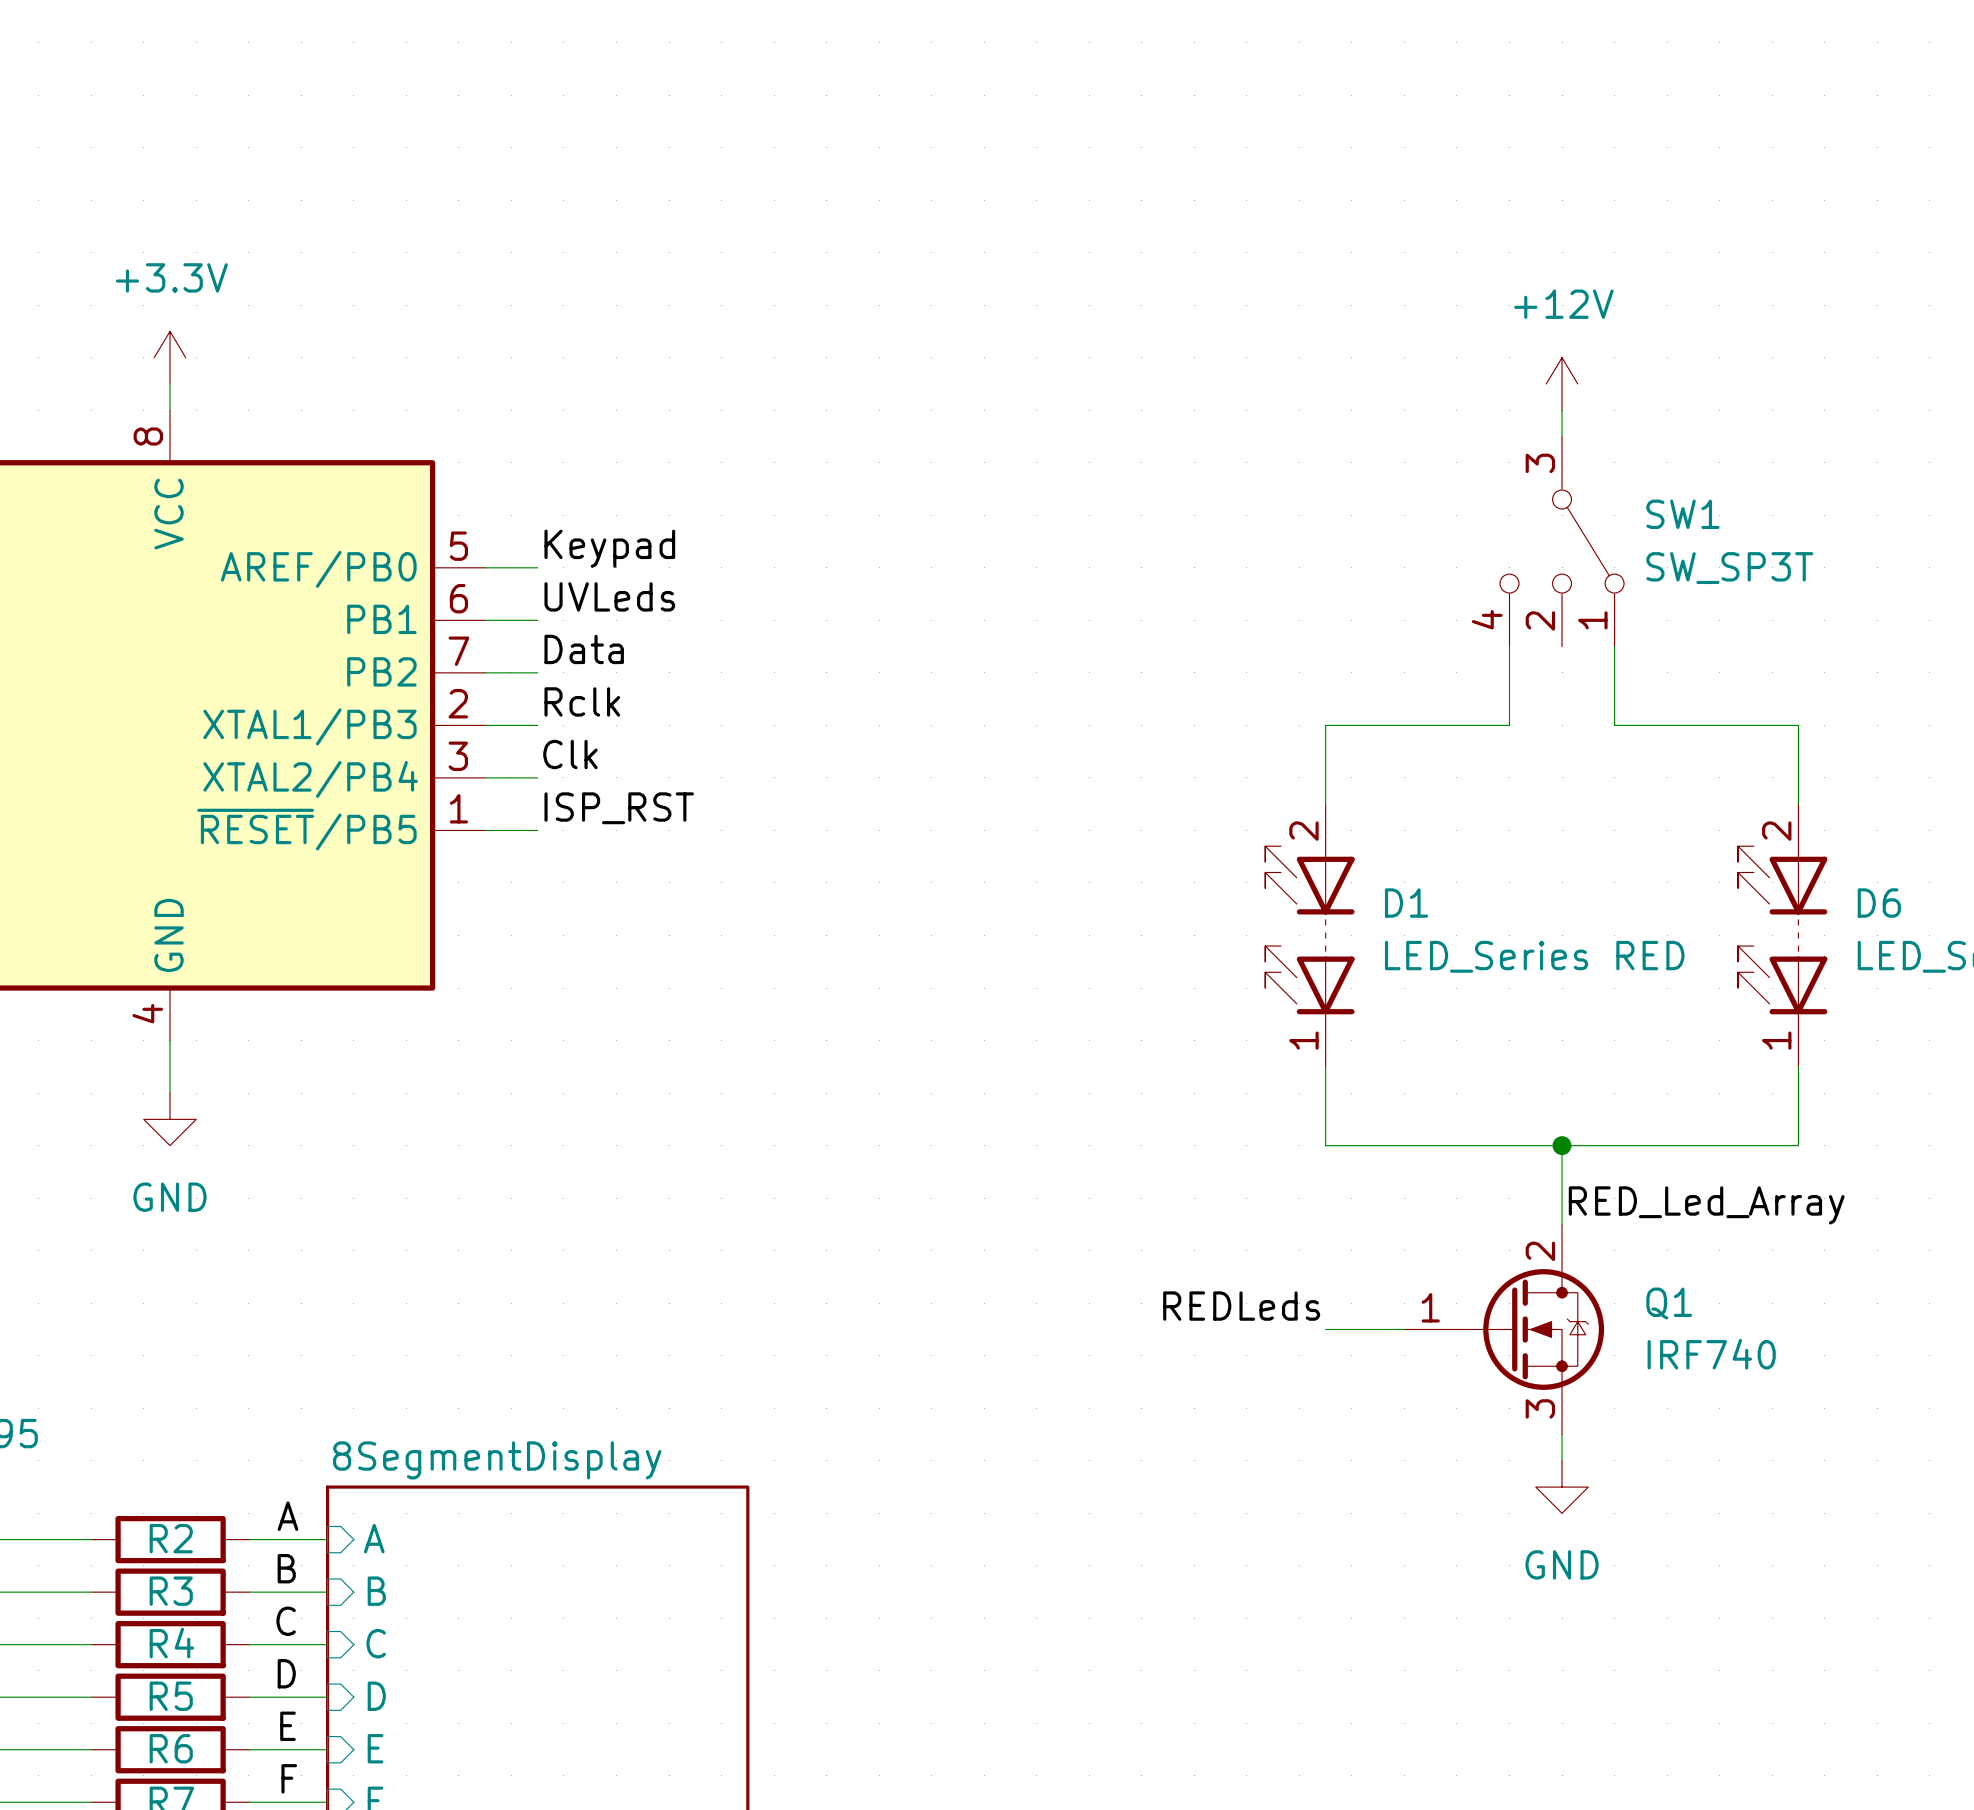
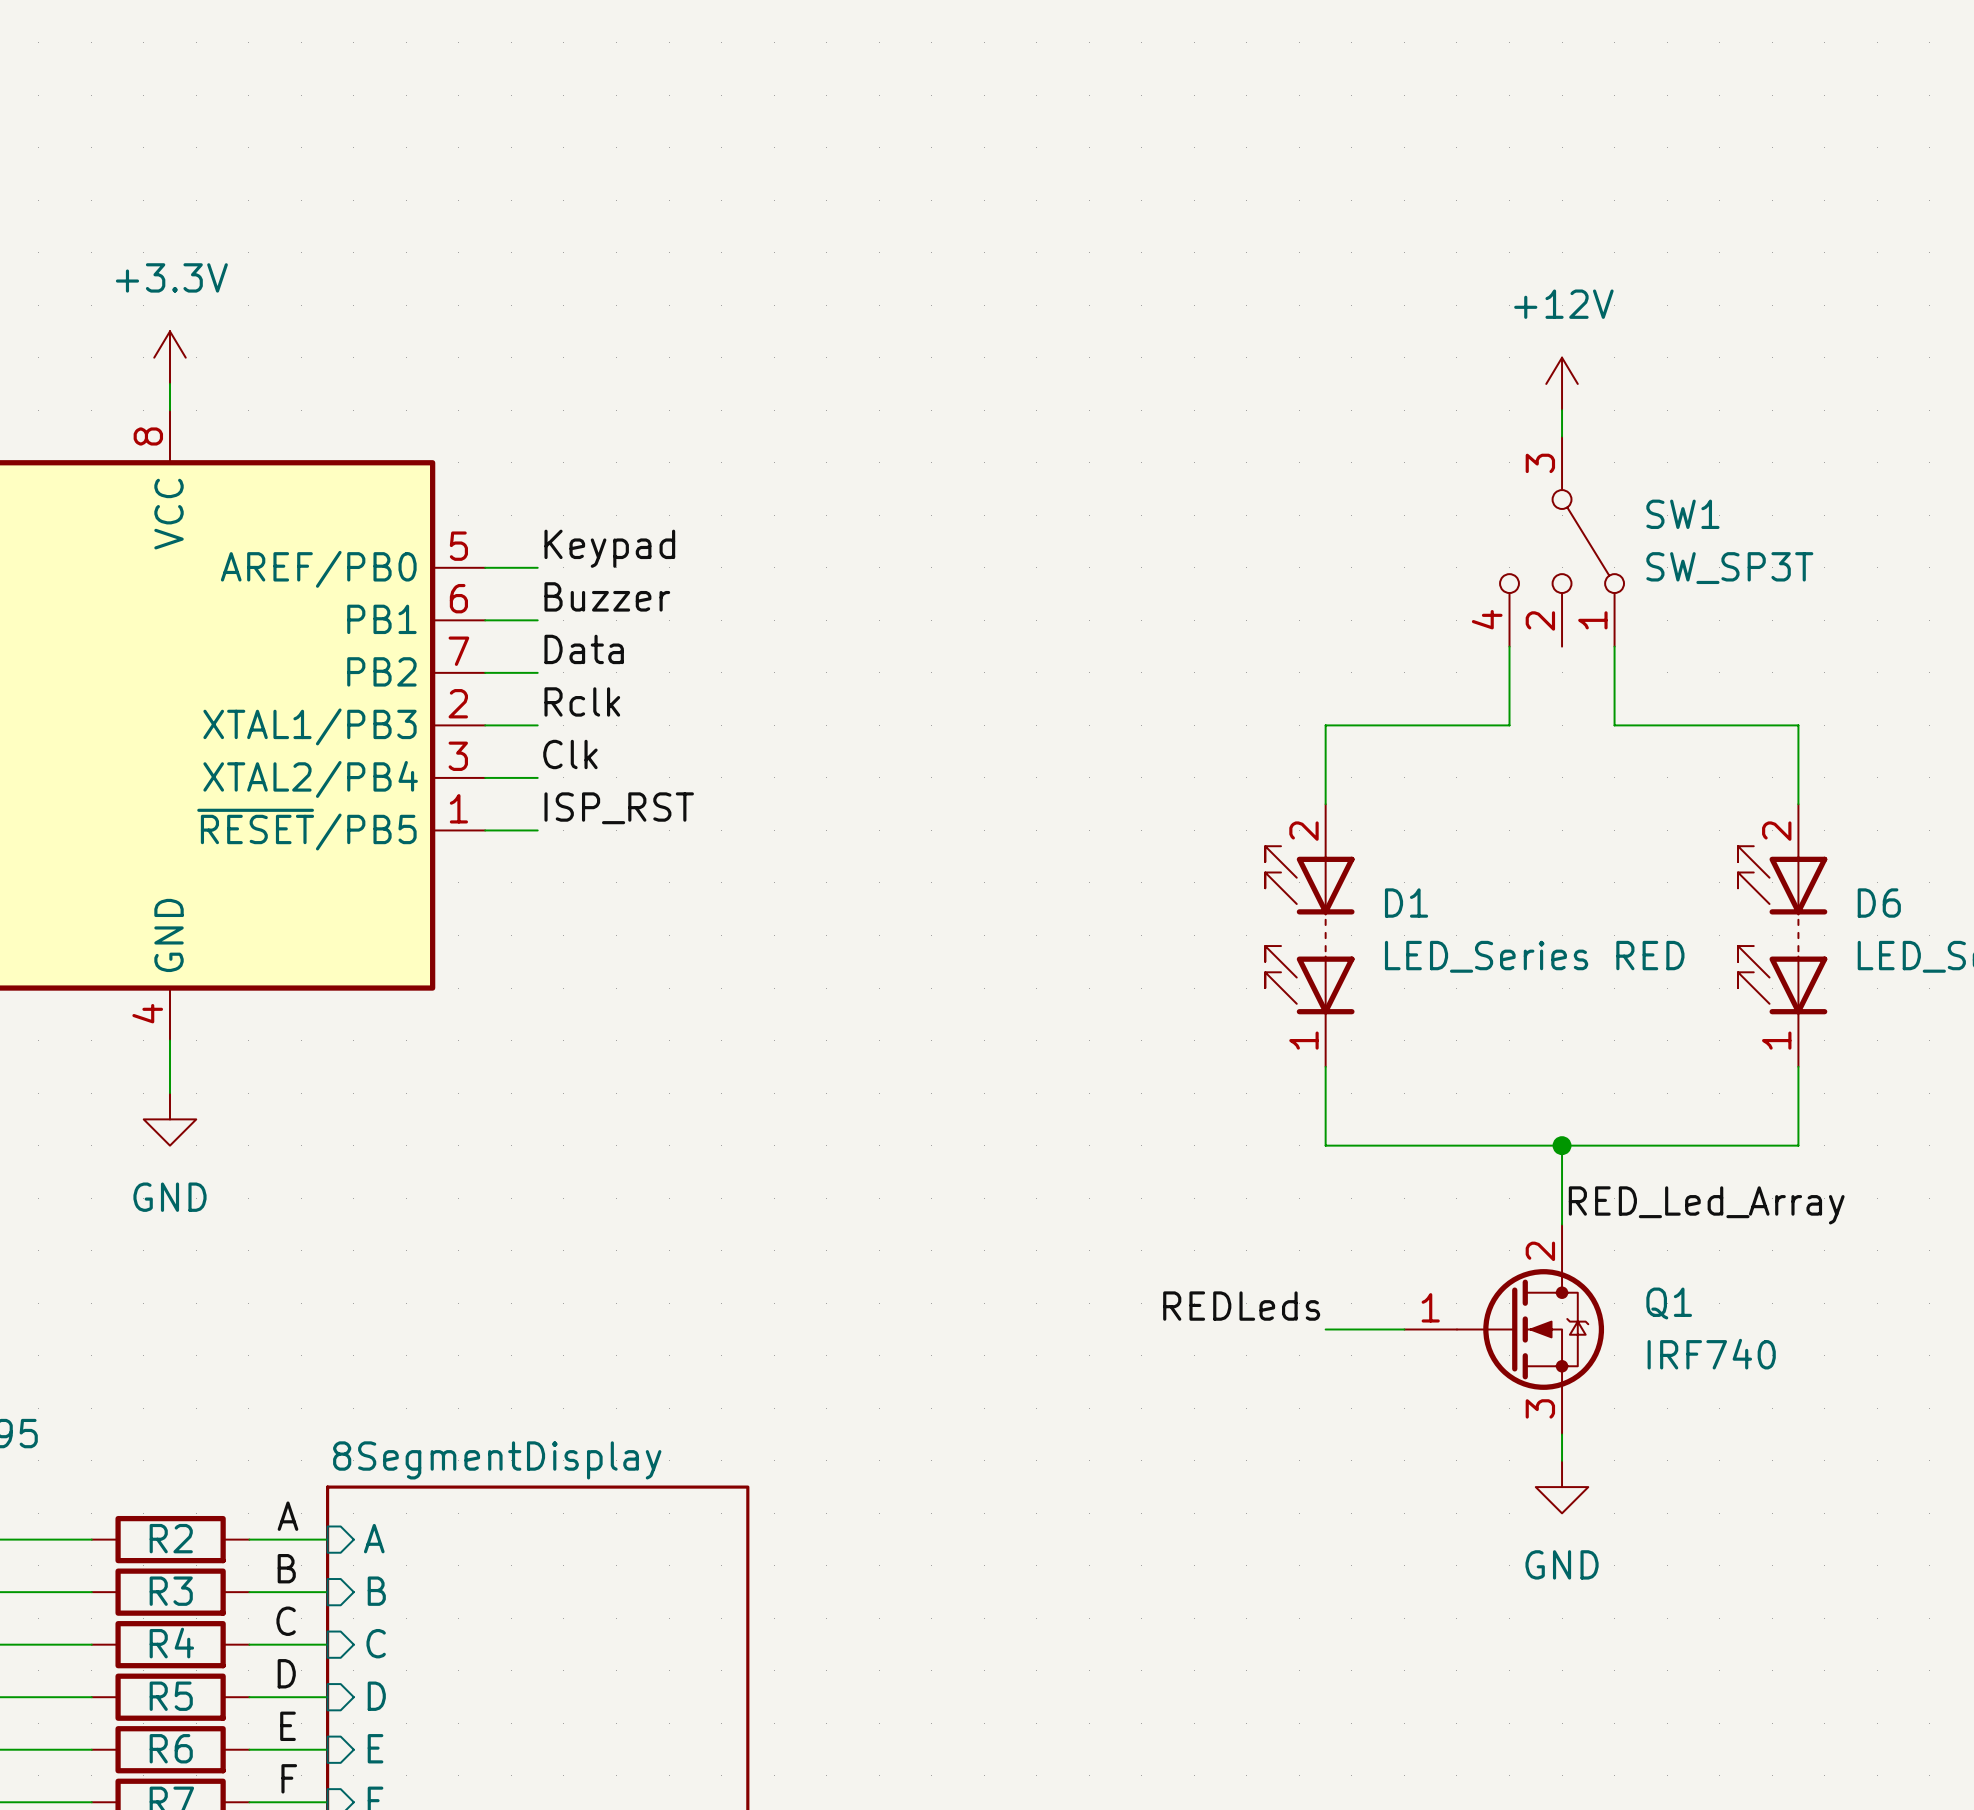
label: UVLeds (609, 596) -> Buzzer (607, 596)

